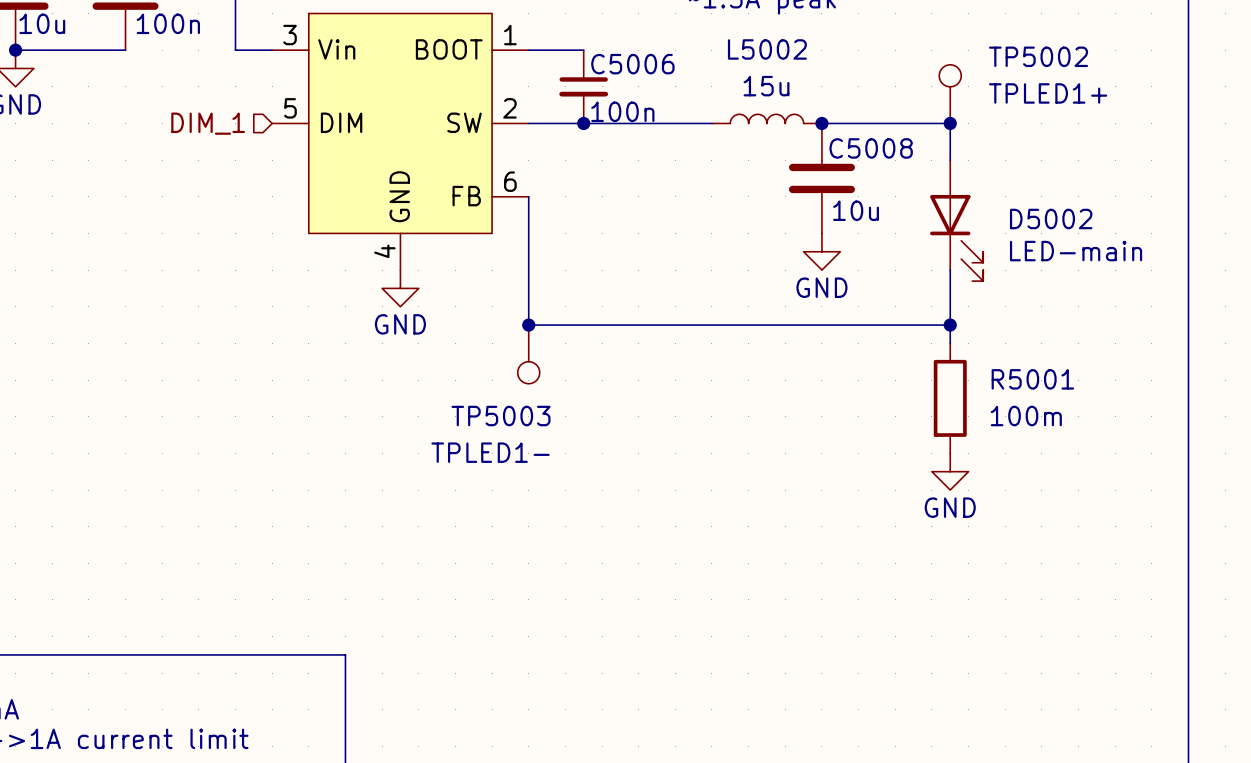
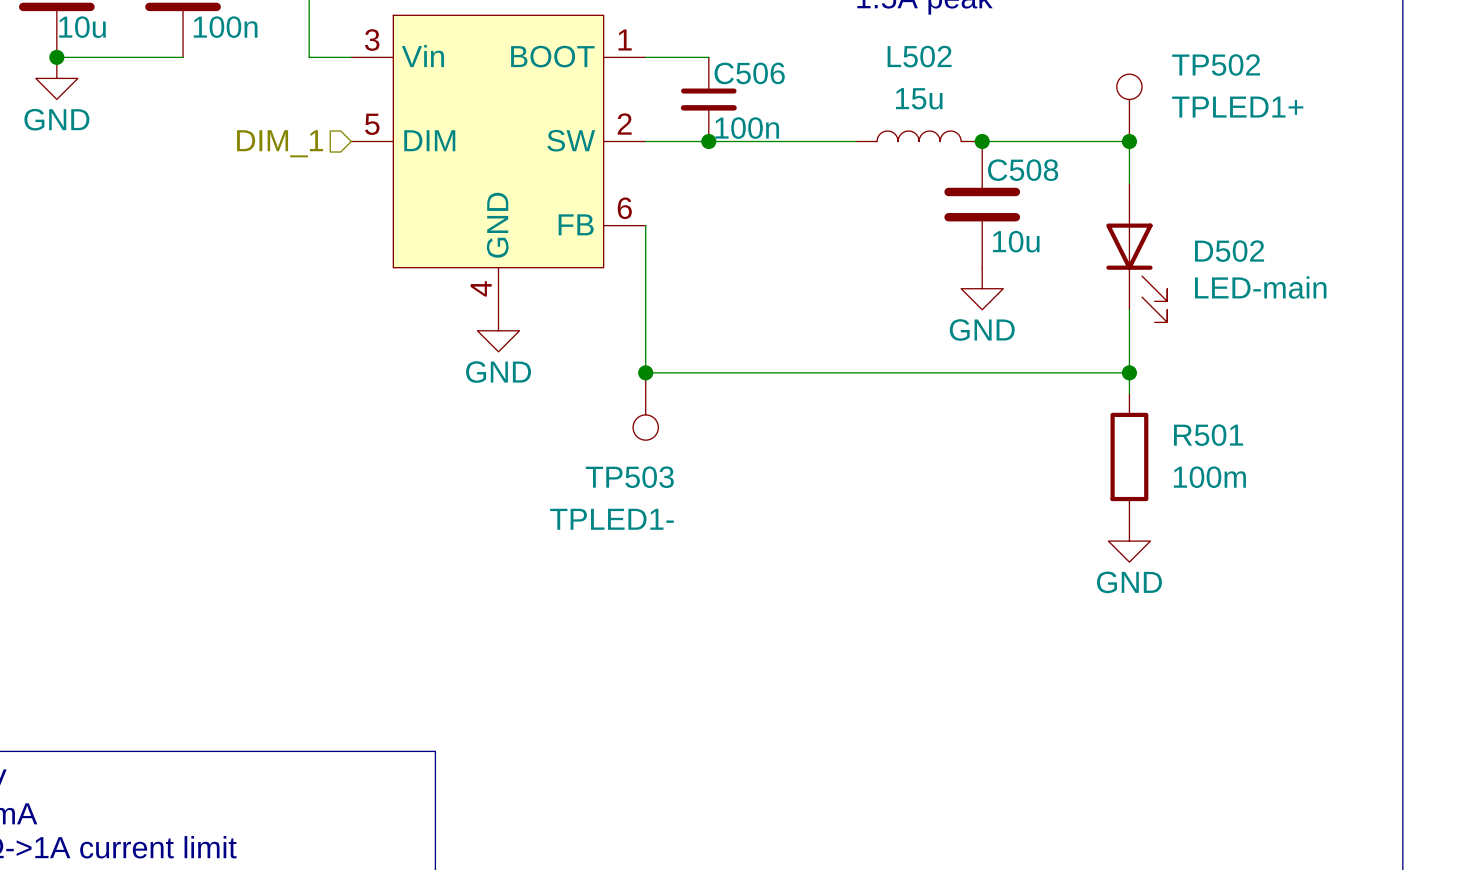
L5002 name: L5002 (767, 49) -> L502 (919, 56)
TP5002 name: TP5002 (1038, 56) -> TP502 (1216, 65)
C5006 name: C5006 (632, 64) -> C506 (749, 73)
C5008 name: C5008 (871, 148) -> C508 (1023, 170)
D5002 name: D5002 (1051, 219) -> D502 (1229, 251)
R5001 name: R5001 (1032, 379) -> R501 (1208, 435)
TP5003 name: TP5003 (501, 416) -> TP503 (629, 477)

